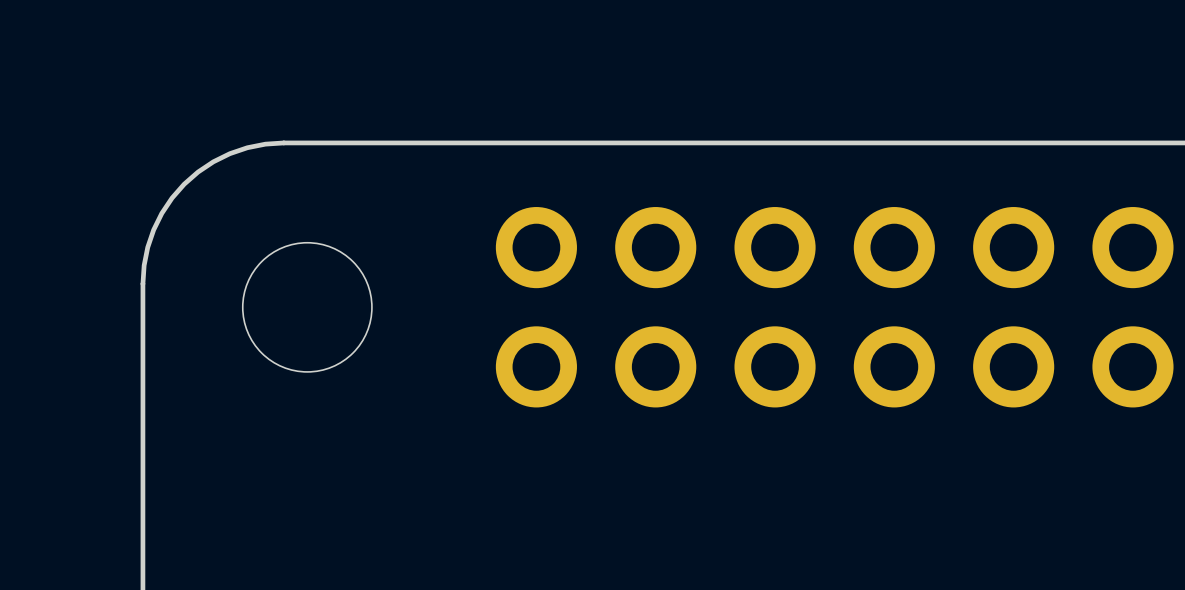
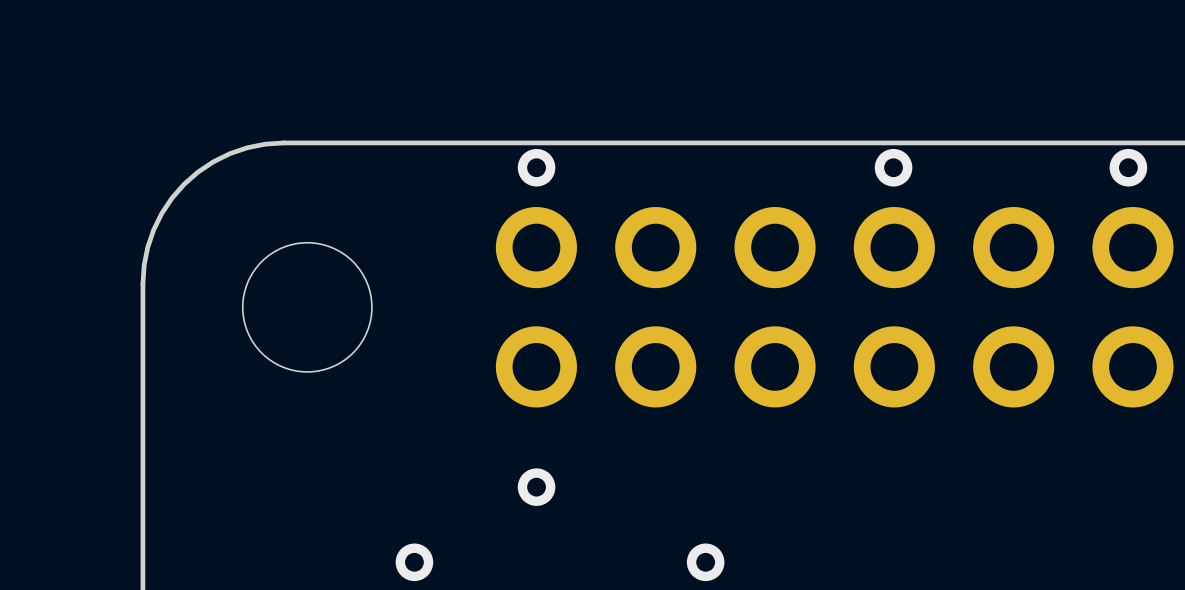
via: none -> (536, 167)
via: none -> (893, 167)
via: none -> (1128, 167)
via: none -> (536, 487)
via: none -> (414, 562)
via: none -> (705, 562)

